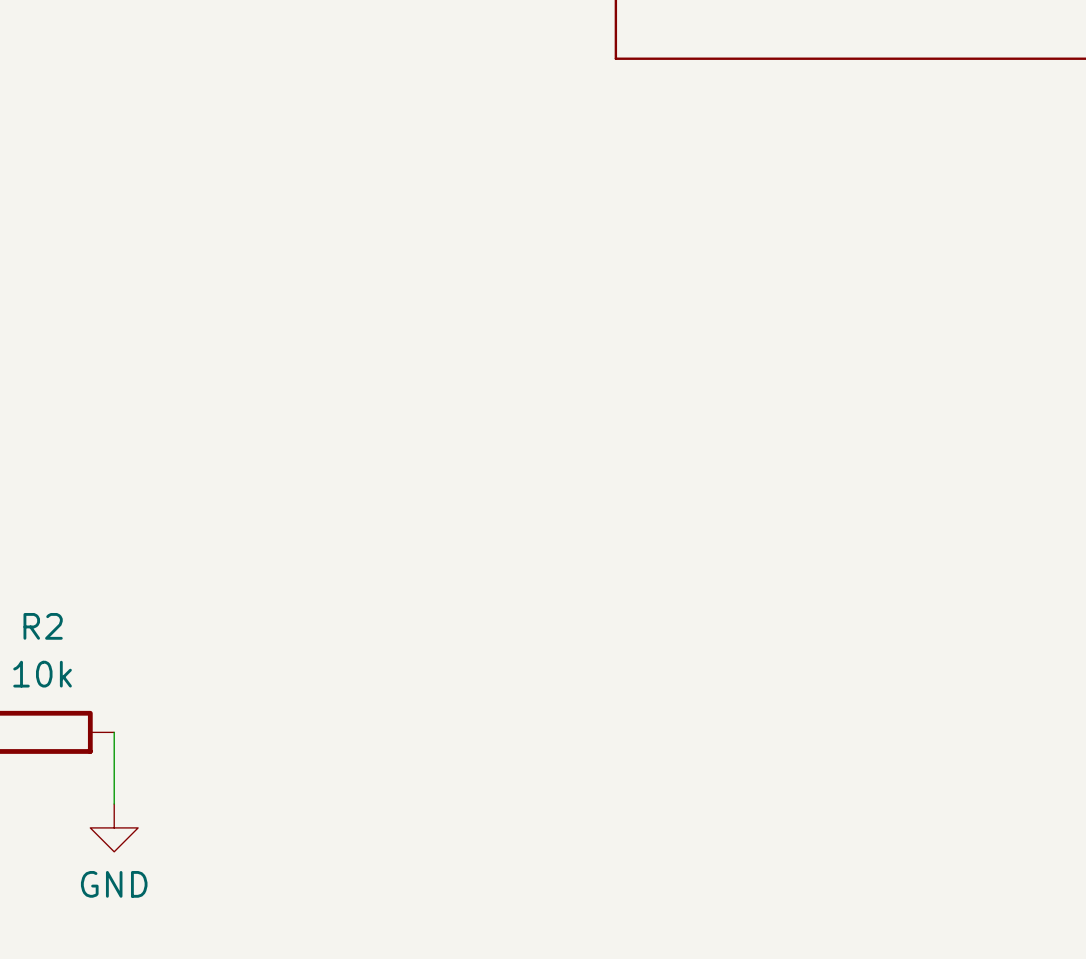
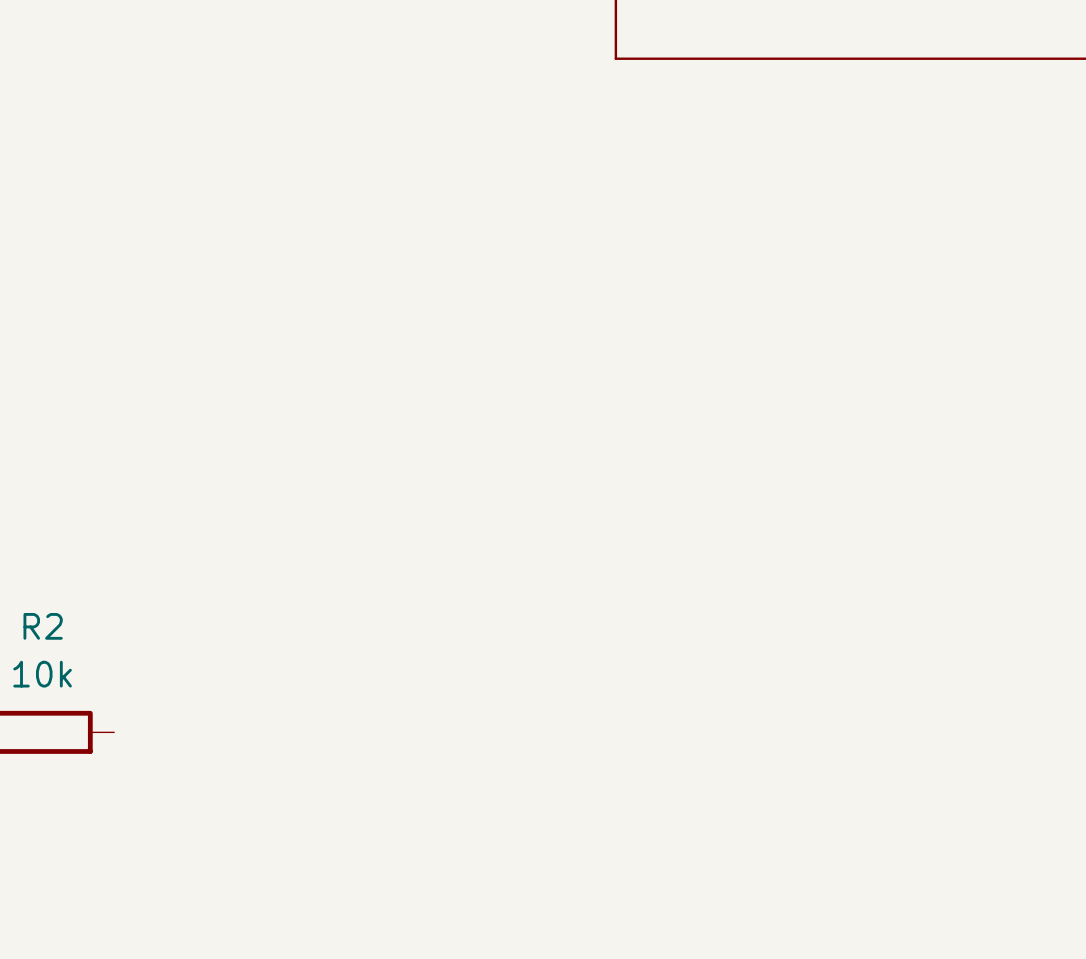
wire: (114, 732) (114, 804) -> none
power symbol: GND (114, 827) -> none

